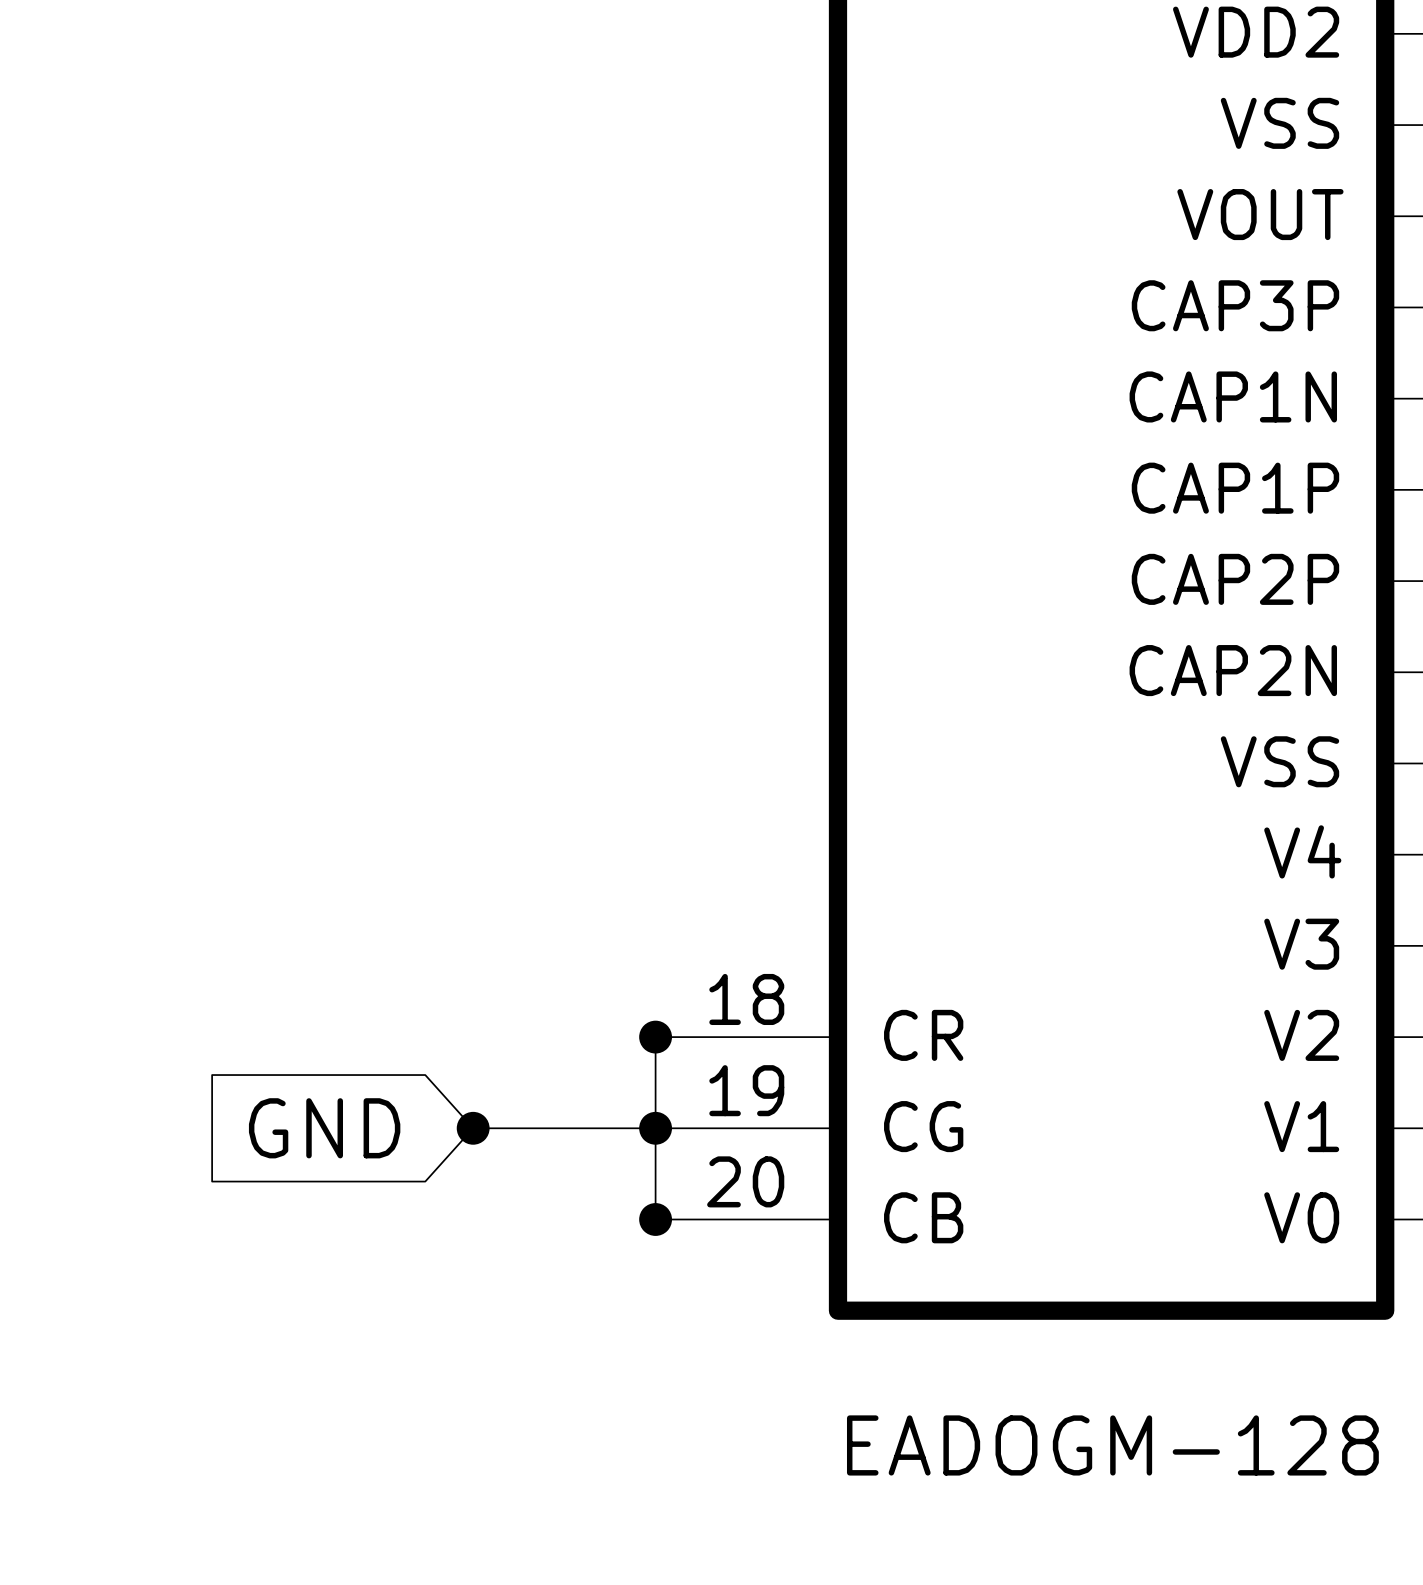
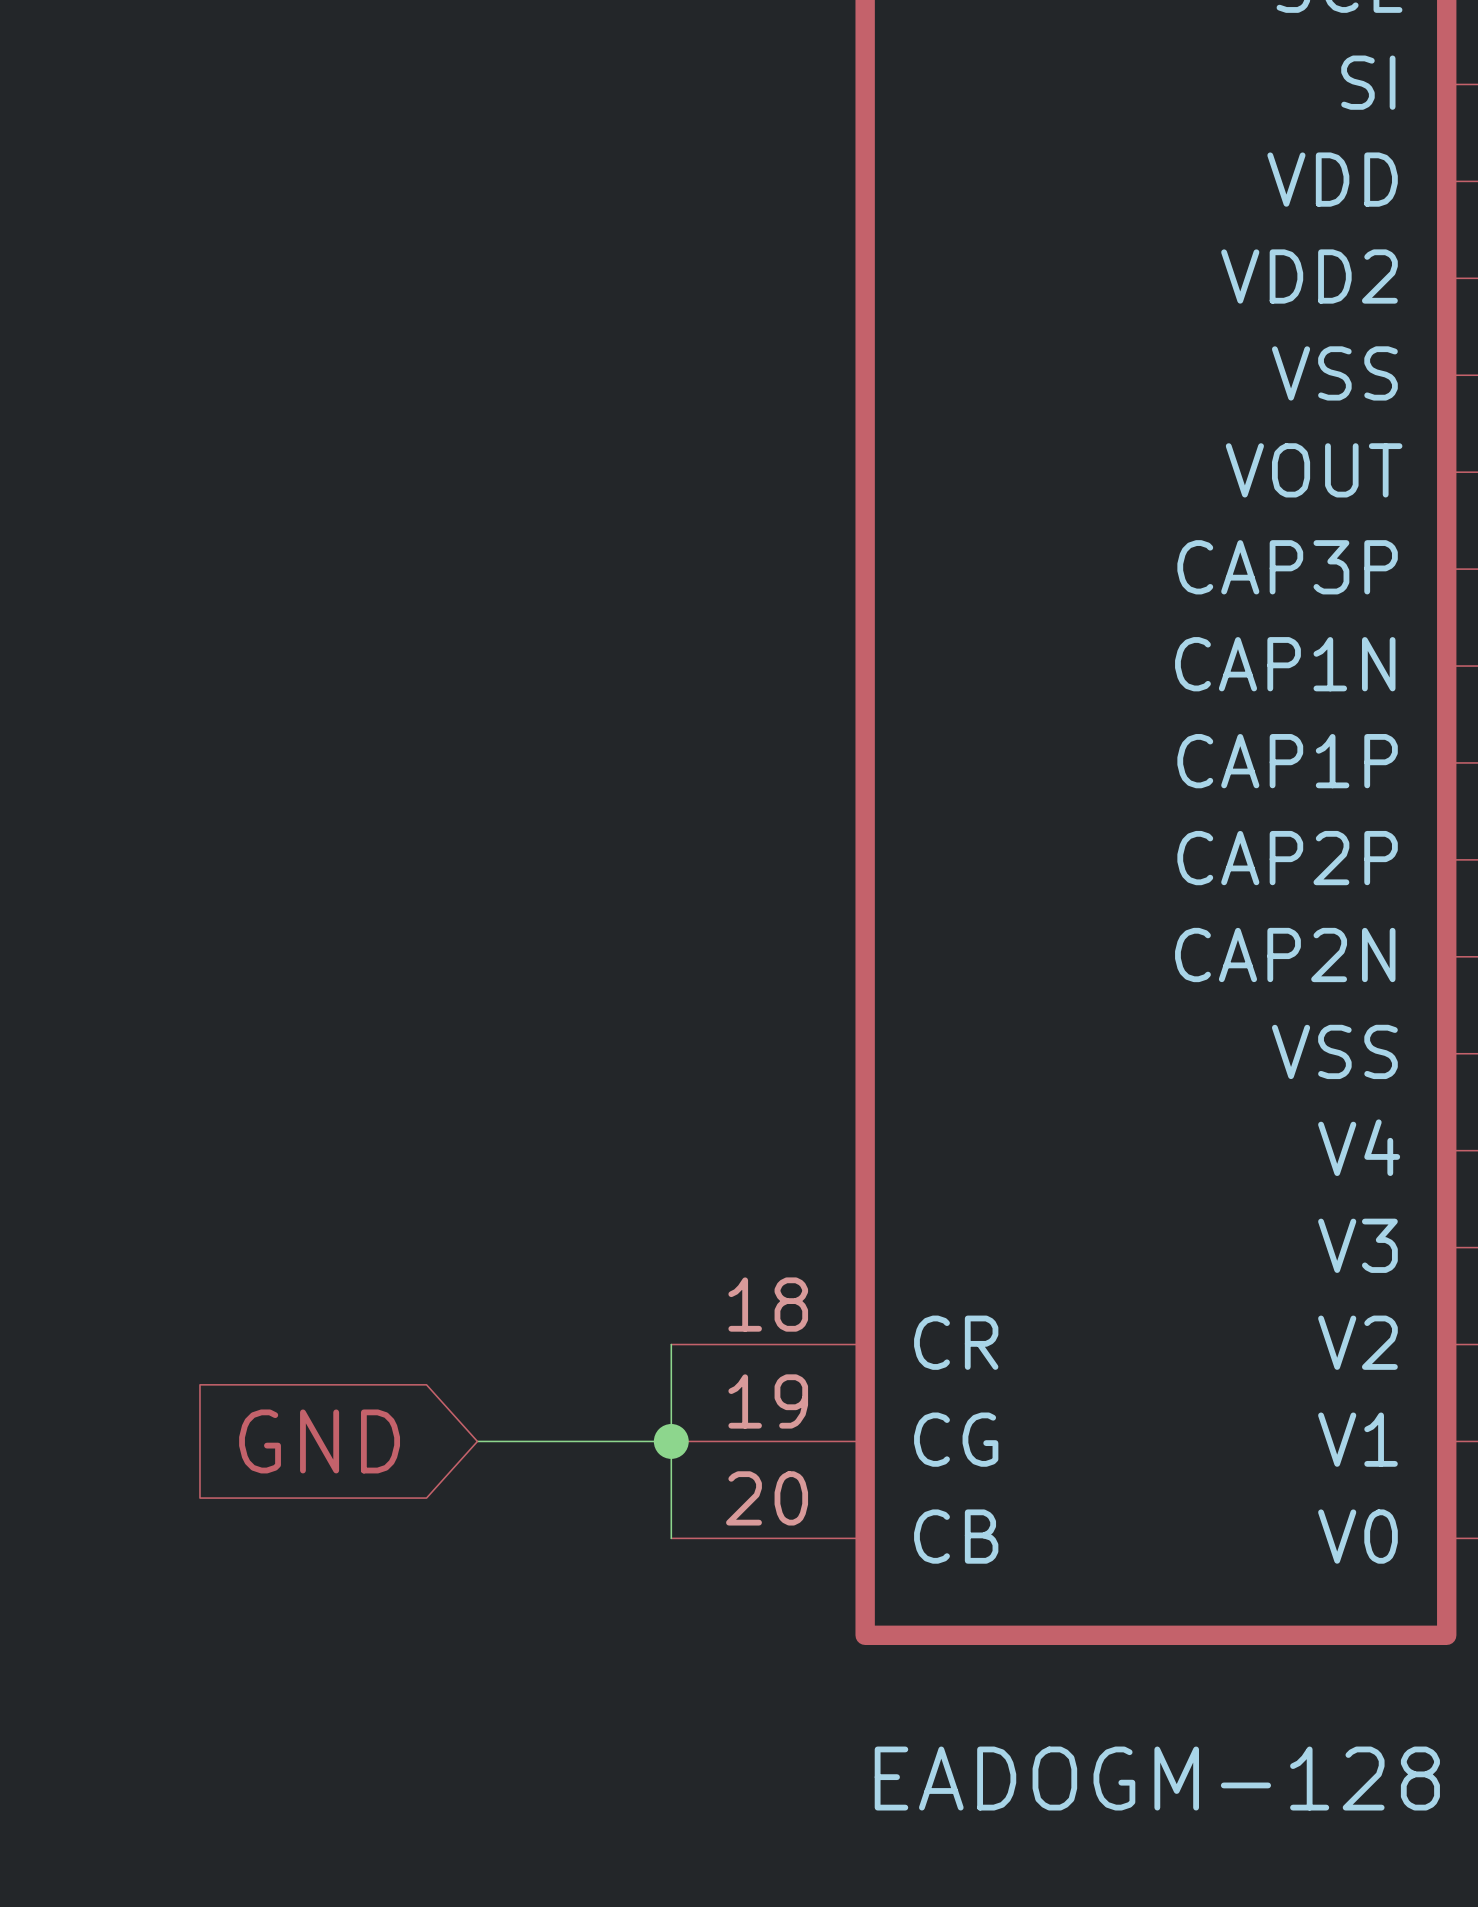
junction: (655, 1037) -> none
junction: (473, 1128) -> none
junction: (655, 1219) -> none

